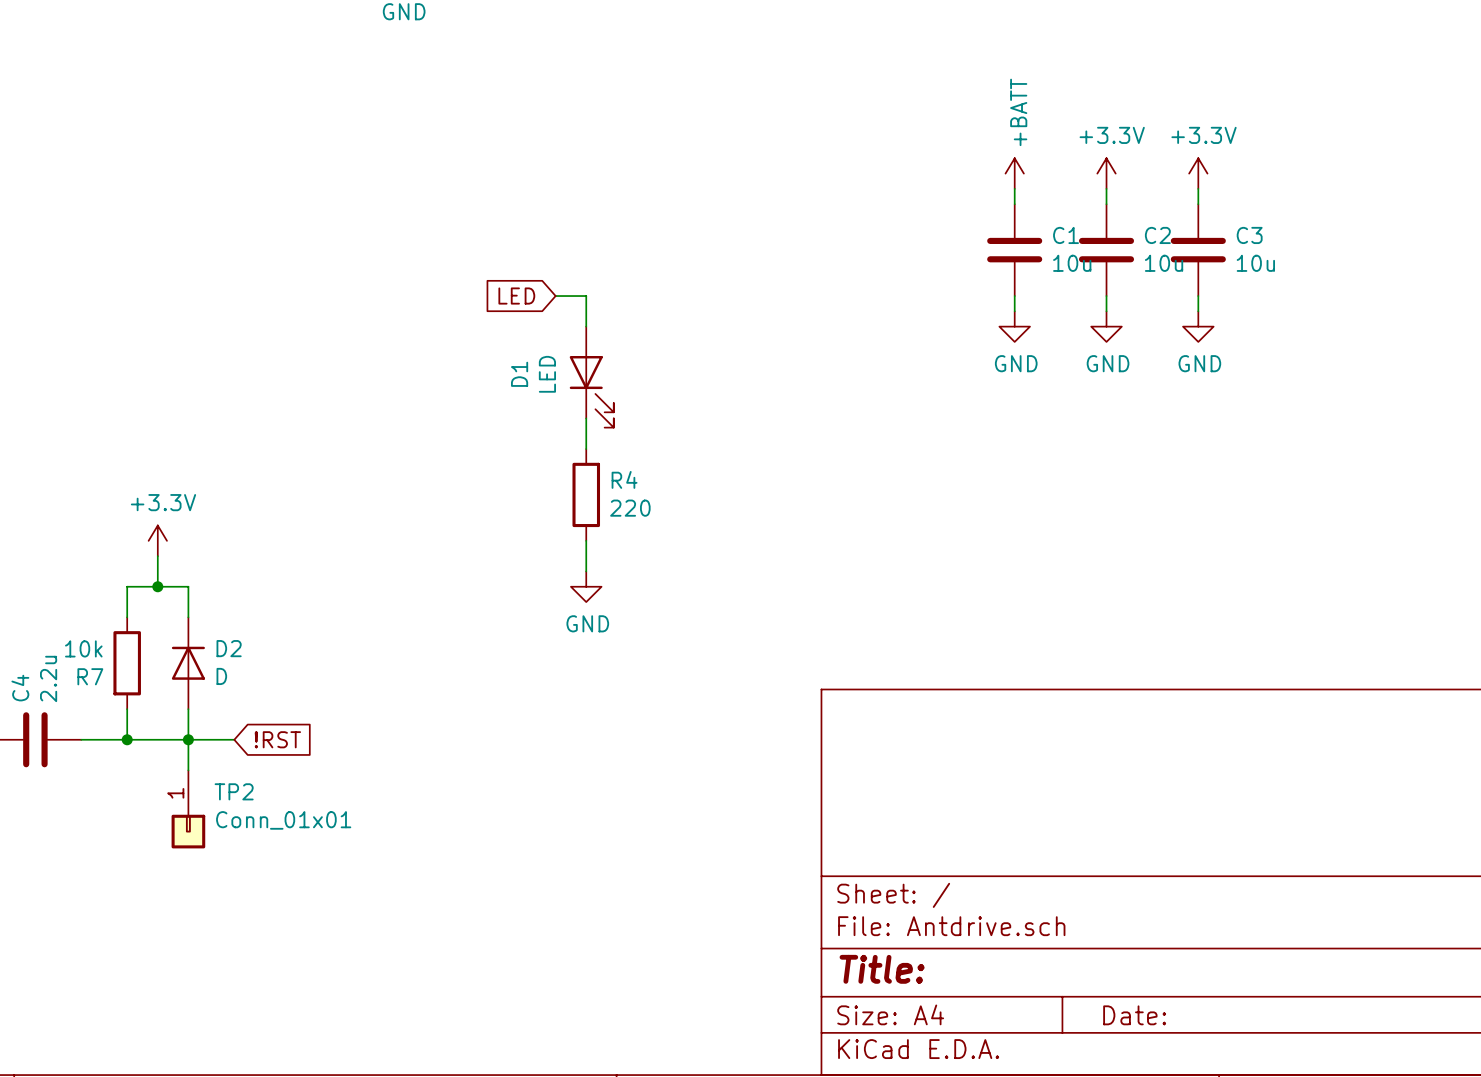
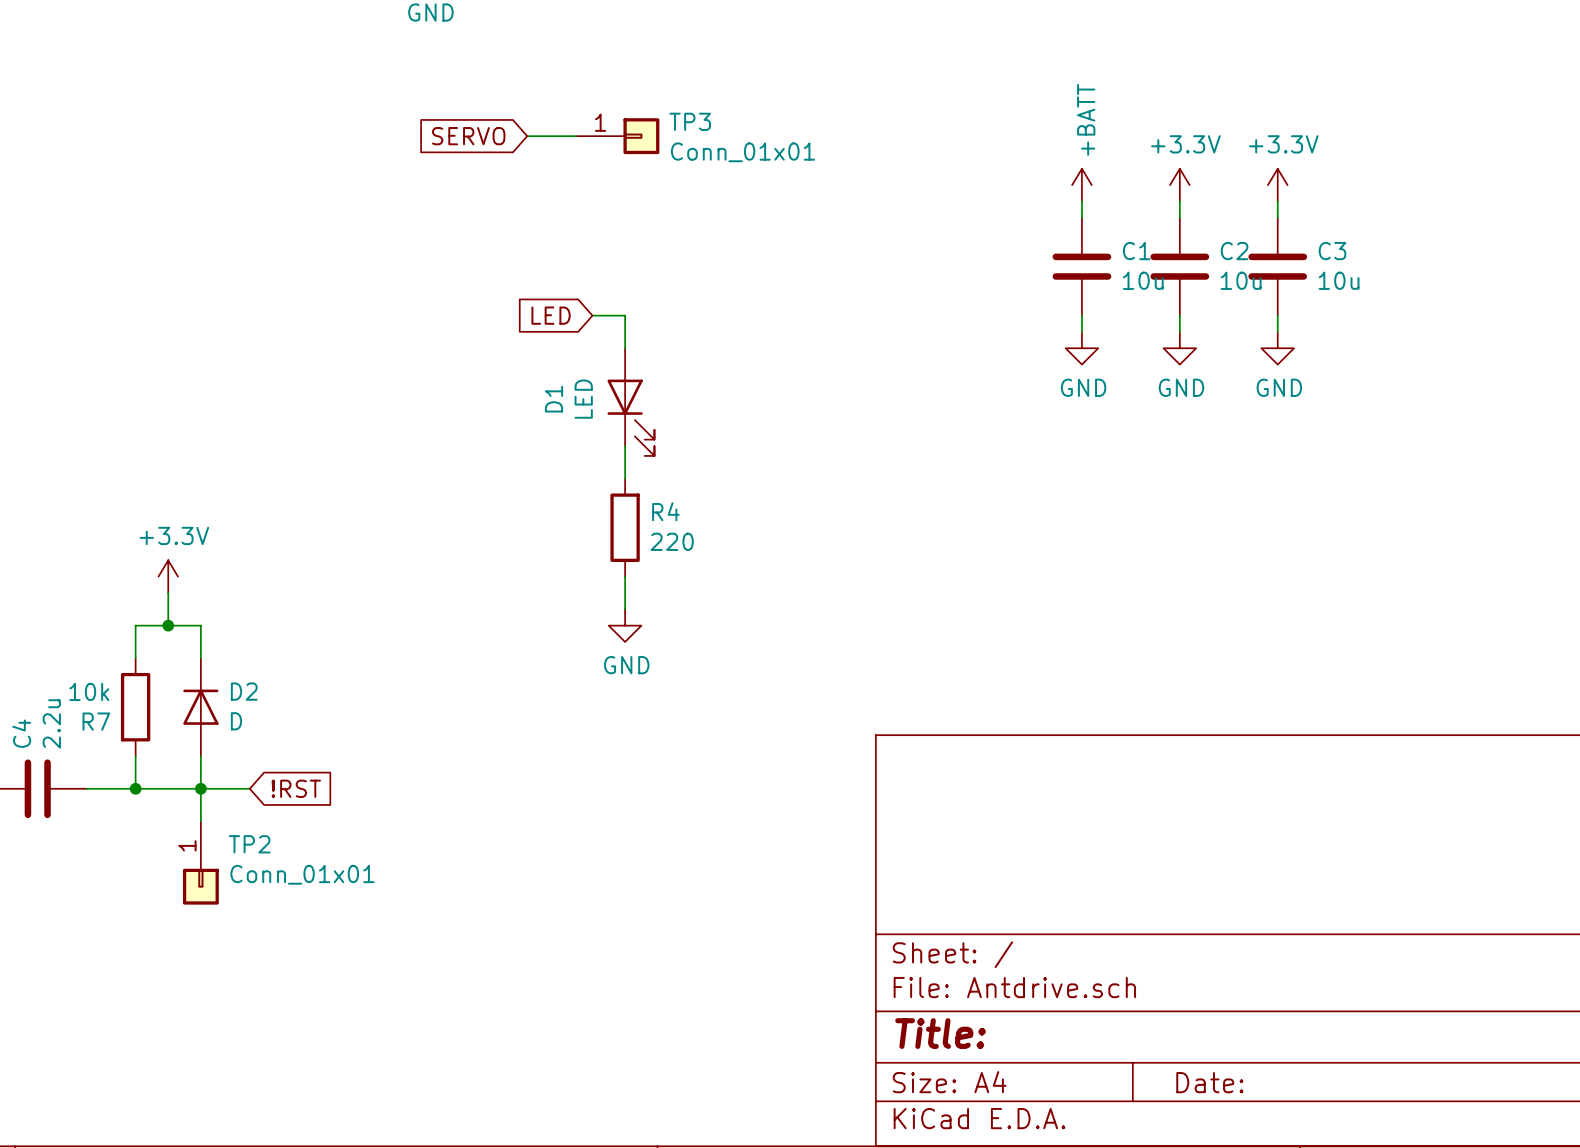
global label: none -> SERVO (468, 136)
wire: none -> (527, 136) (576, 136)
TP3: none -> Conn_01x01 (617, 136)

